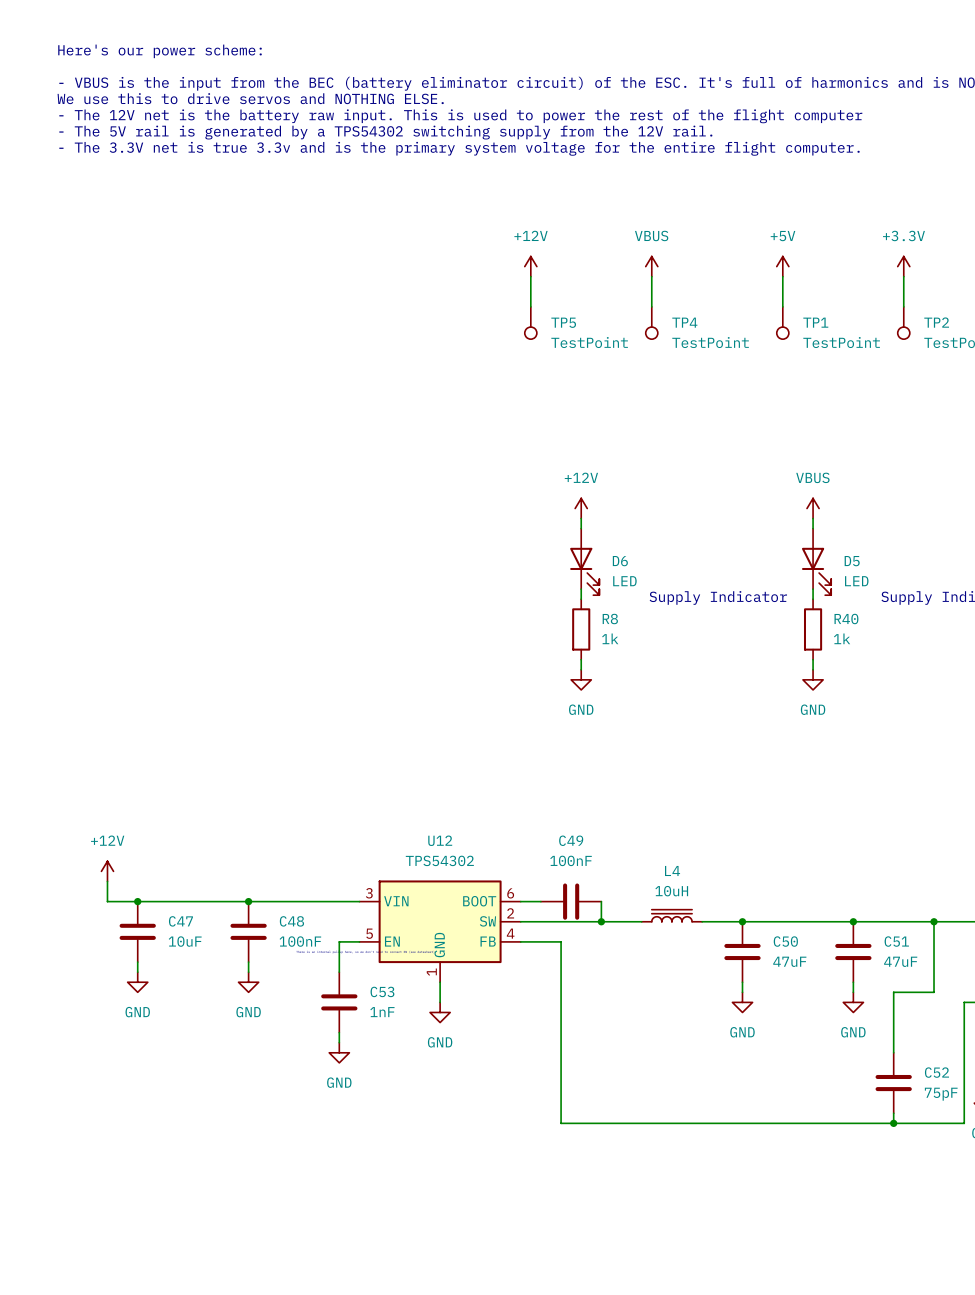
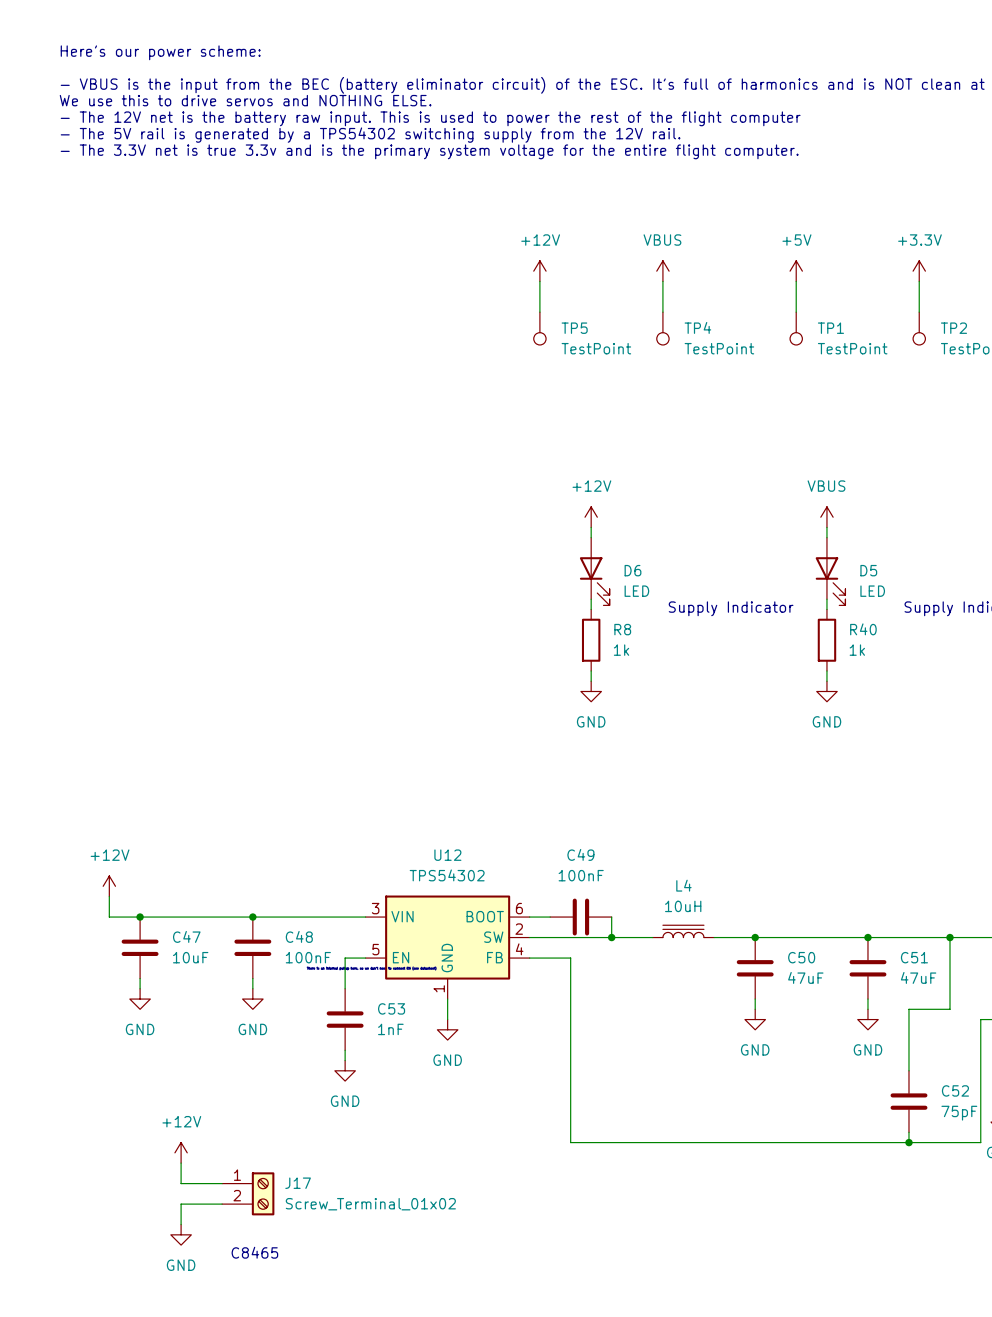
power symbol: none -> +12V (181, 1152)
wire: none -> (181, 1163) (181, 1183) (222, 1183)
J17: none -> Screw_Terminal_01x02 (248, 1193)
wire: none -> (222, 1204) (181, 1204) (181, 1224)
power symbol: none -> GND (181, 1234)
text: none -> C8465 (254, 1252)

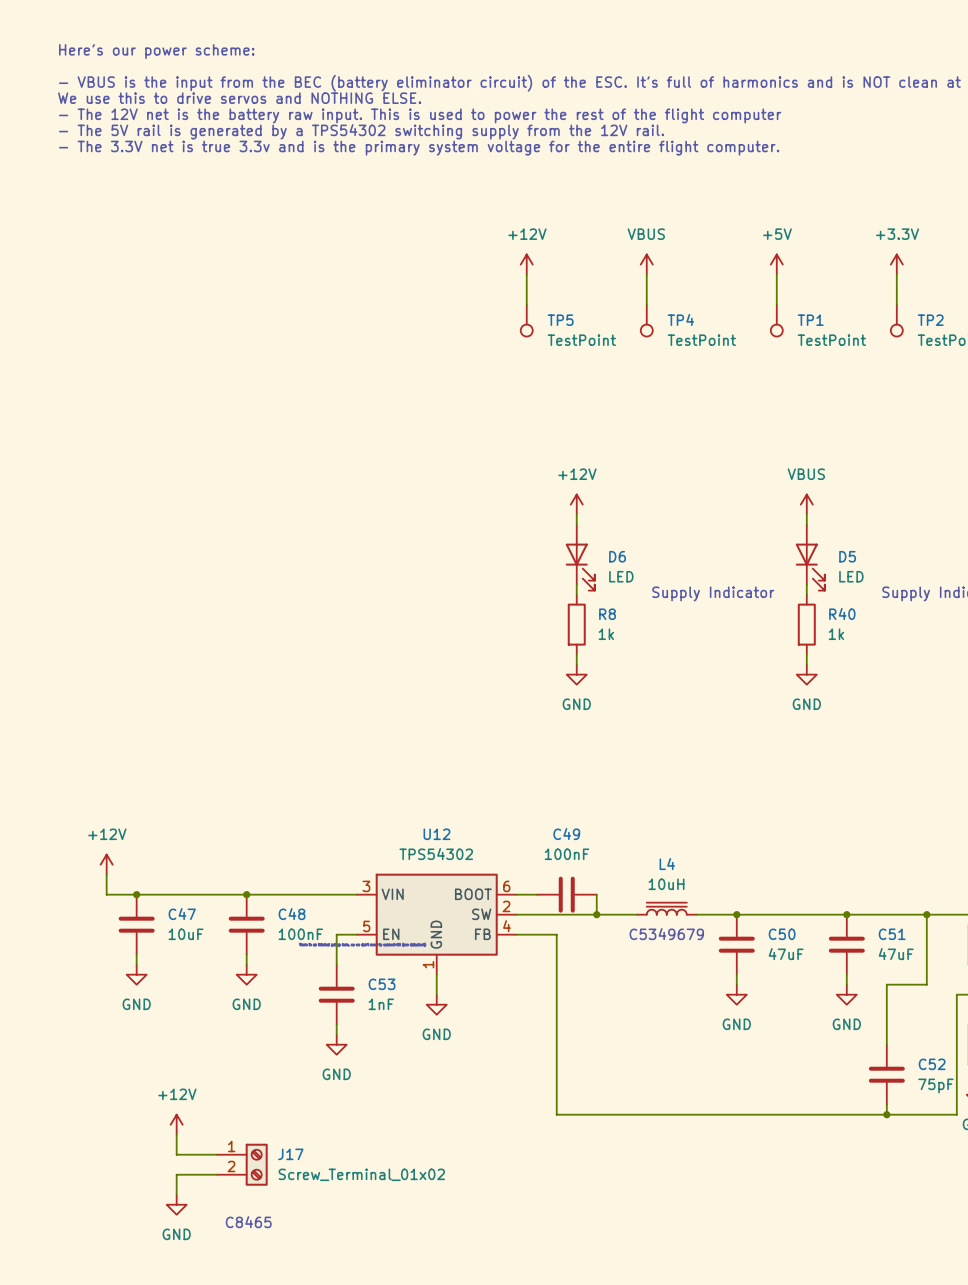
text: none -> C5349679 (666, 934)

